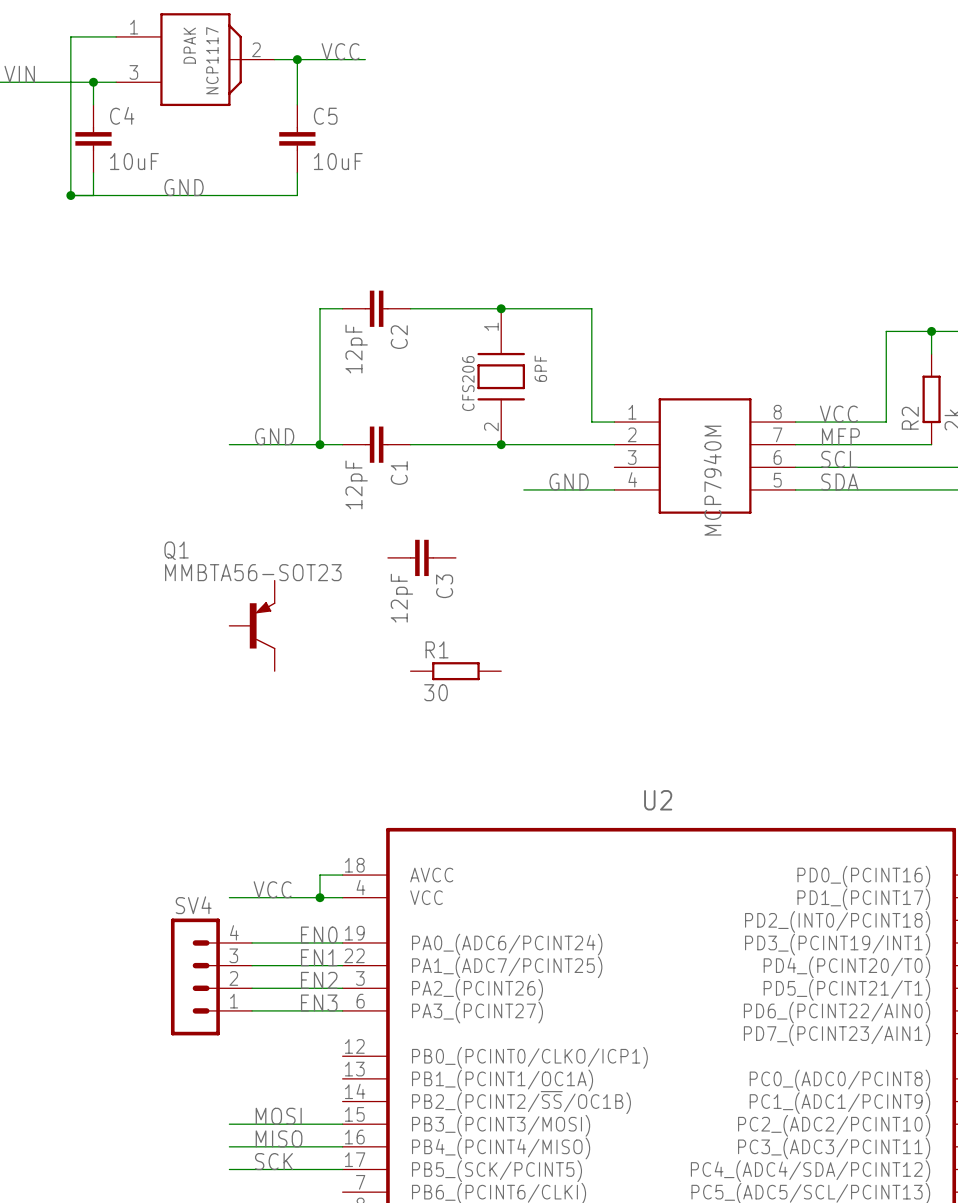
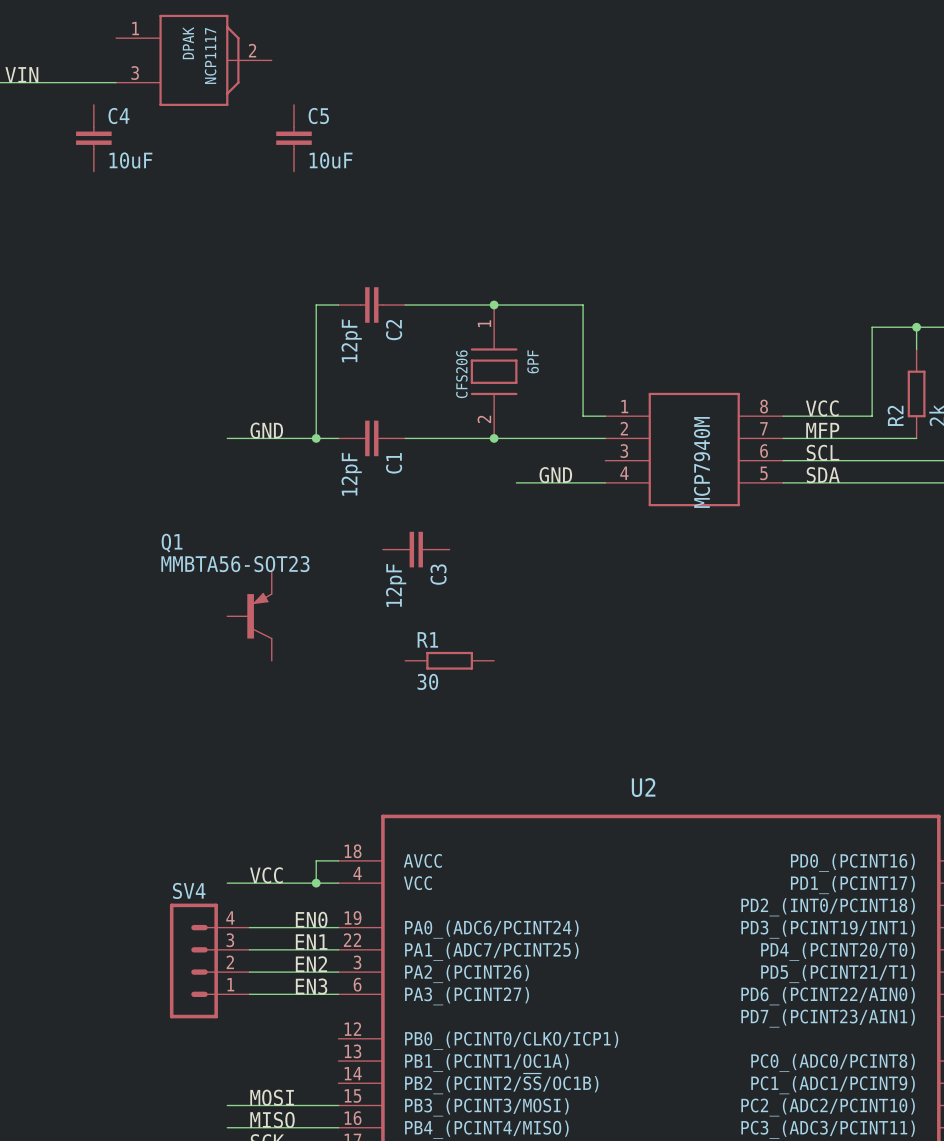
wire: (116, 36) (70, 36) (70, 195) (297, 195) (297, 172) -> none
label: VCC (340, 51) -> none
wire: (274, 59) (365, 59) -> none
wire: (297, 59) (297, 104) -> none
junction: (297, 59) -> none
wire: (93, 82) (93, 104) -> none
junction: (93, 82) -> none
wire: (93, 172) (93, 195) -> none
label: GND (184, 187) -> none
junction: (70, 195) -> none

